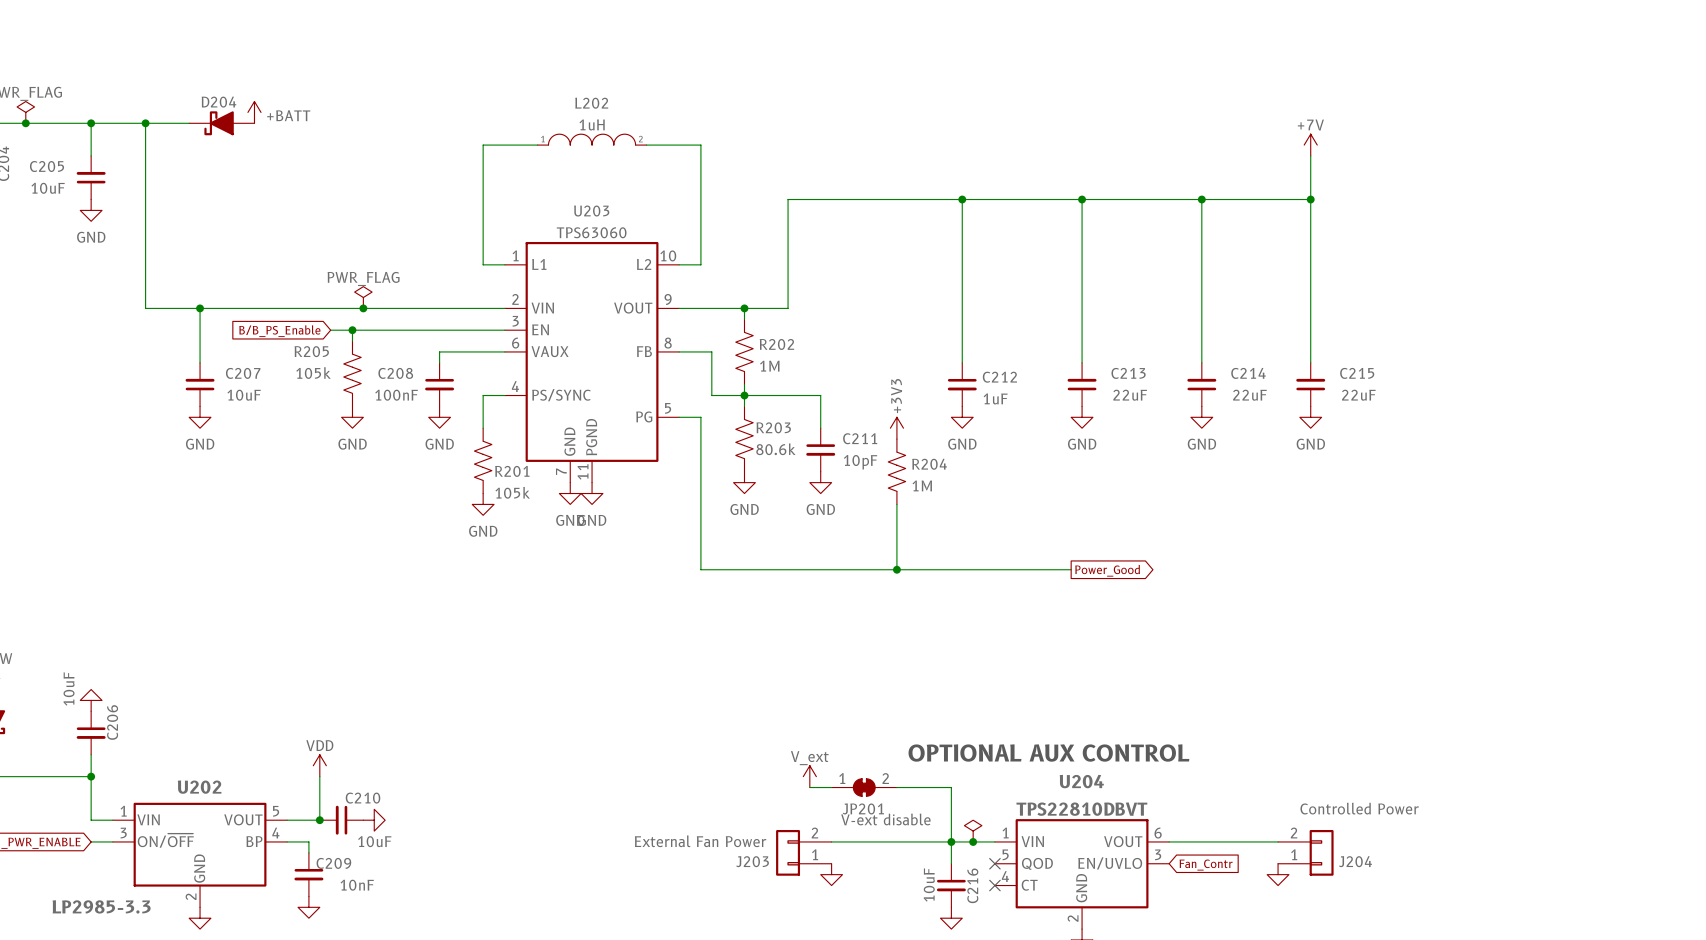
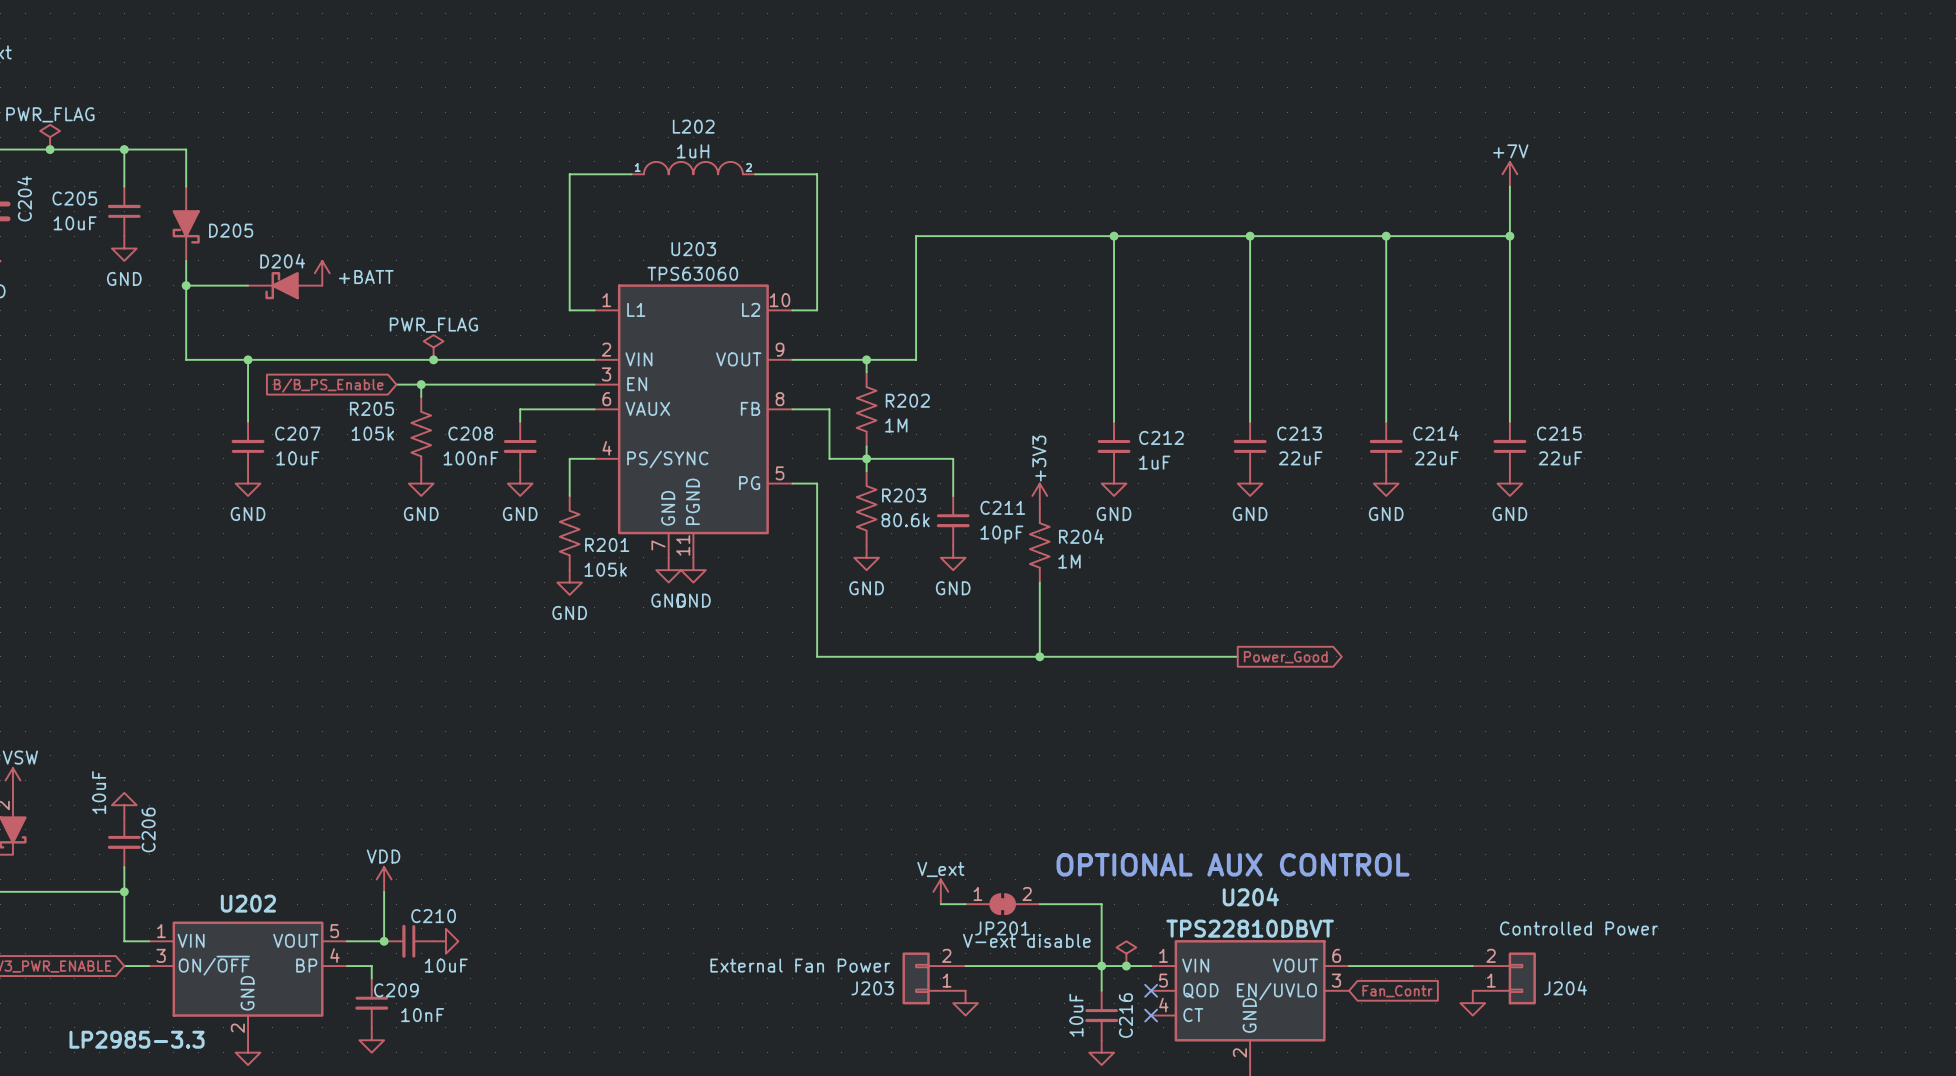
power symbol position: +BATT (254, 112) -> +BATT (322, 273)
wire: (145, 123) (189, 123) -> none
junction: (145, 123) -> none
D204 position: (221, 123) -> (285, 285)
D205: none -> (186, 223)
wire: none -> (186, 285) (248, 285)
junction: none -> (186, 285)

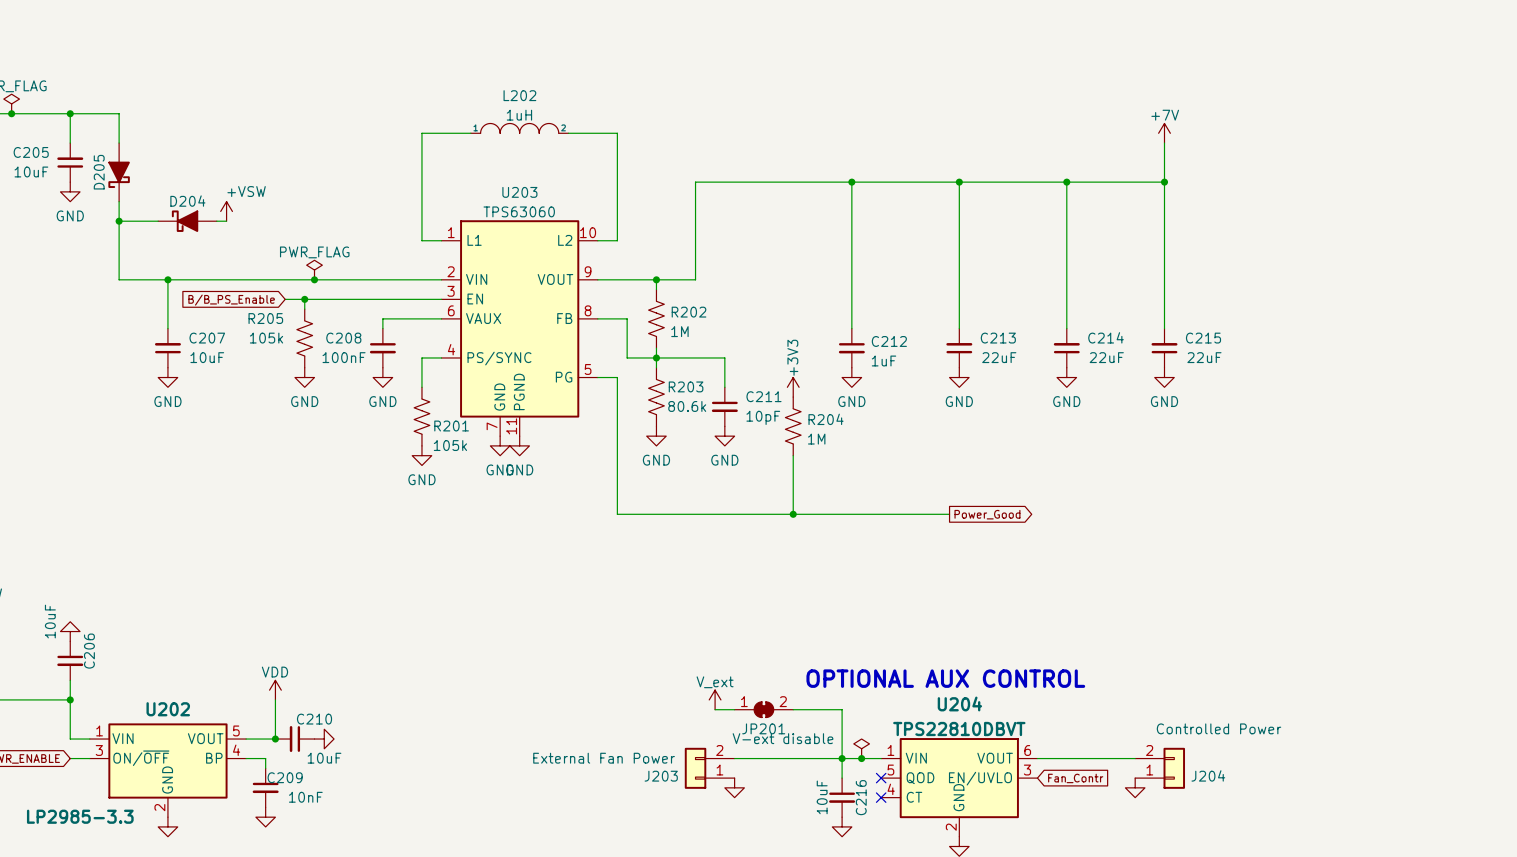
D205 flip: as is (186, 226) -> left-right (119, 174)
D205 name position: D205 (231, 230) -> D205 (99, 172)
power symbol: +BATT (322, 273) -> +VSW (226, 211)
D204 flip: as is (282, 285) -> up-down (185, 221)

